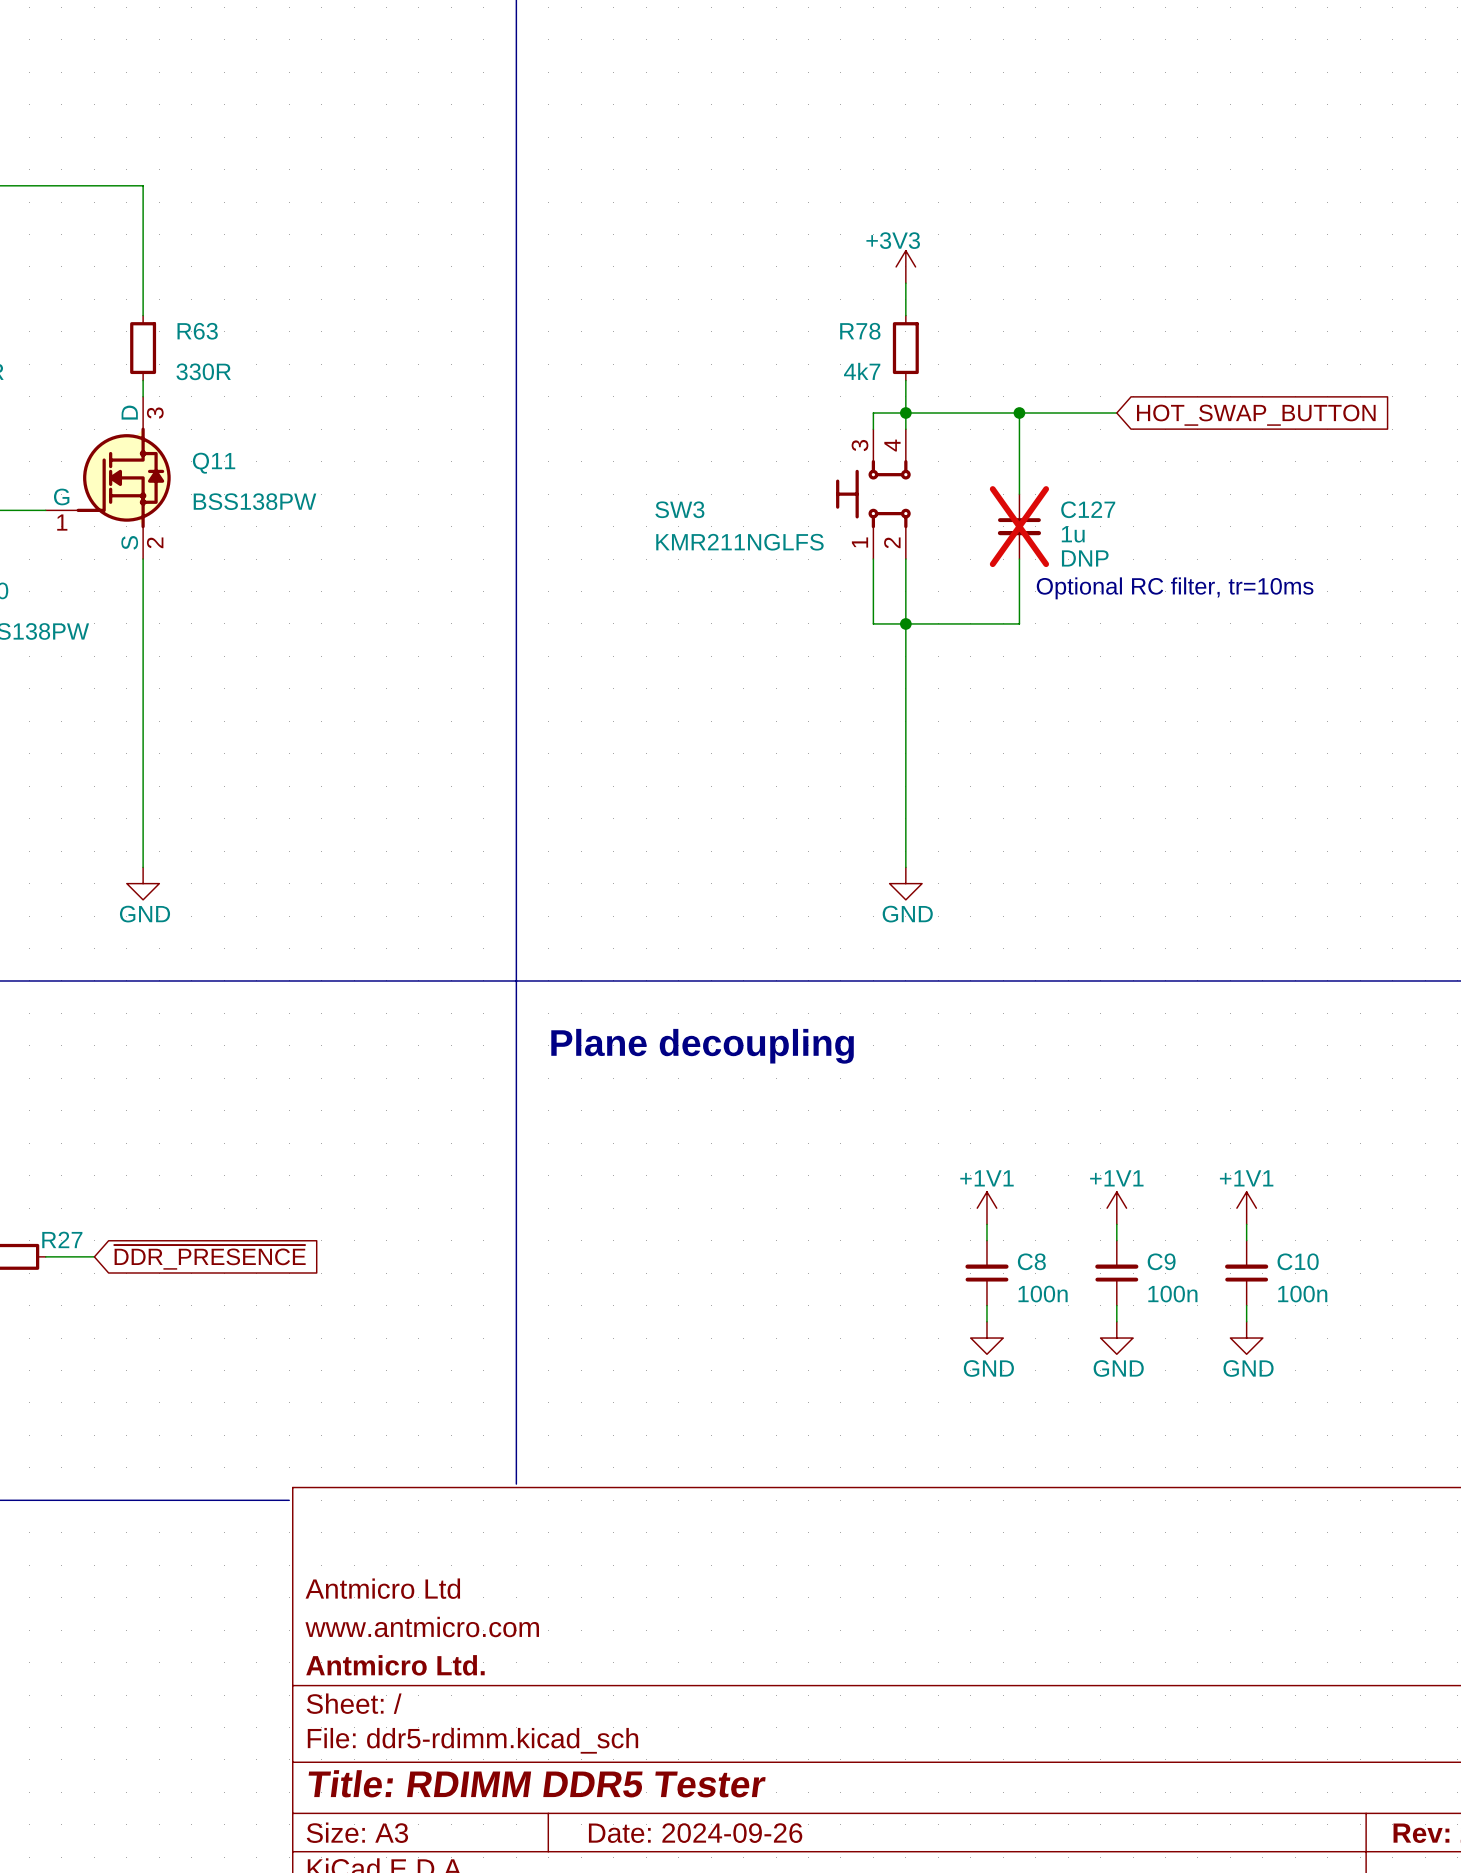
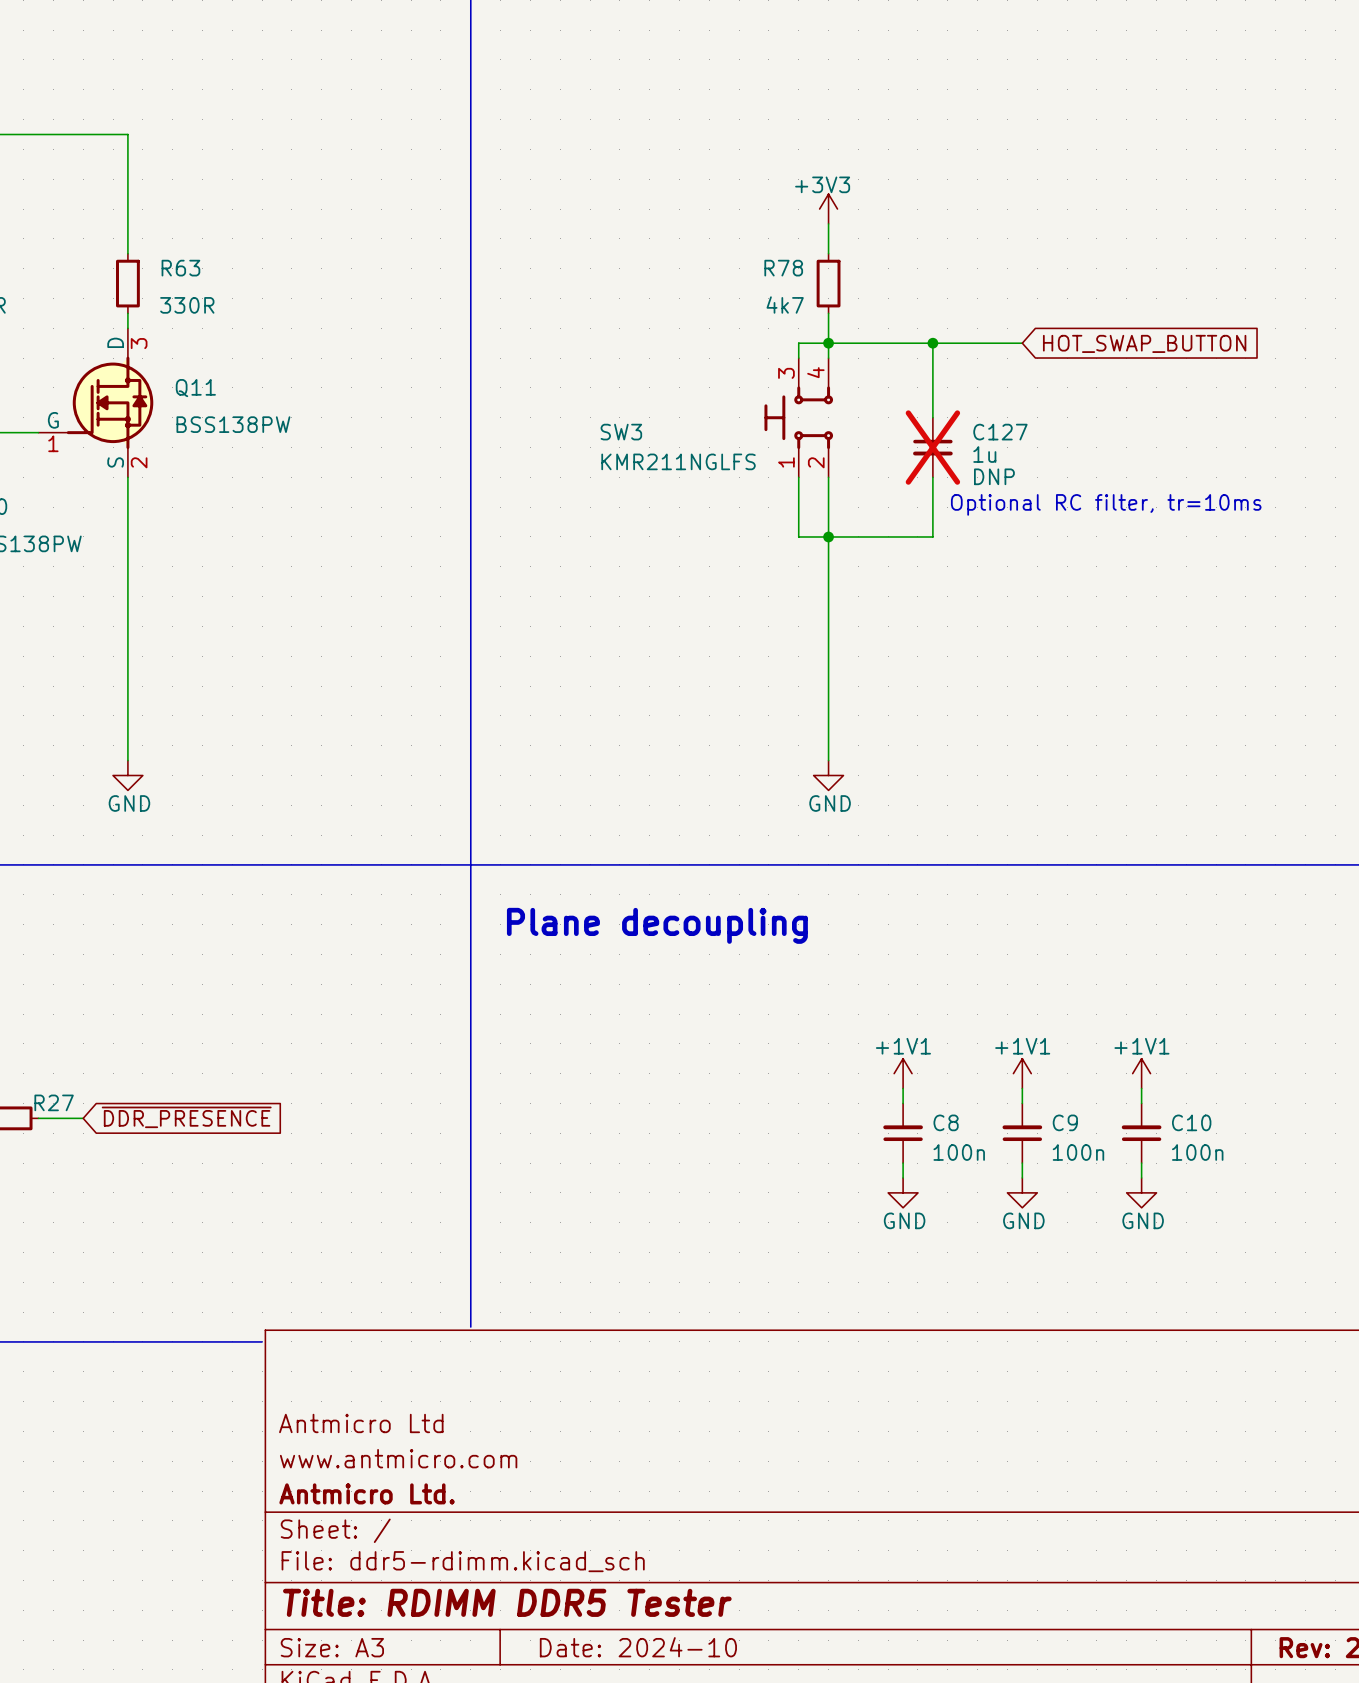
title block: Date: 2024-09-26 (695, 1833) -> Date: 2024-10 (638, 1647)

